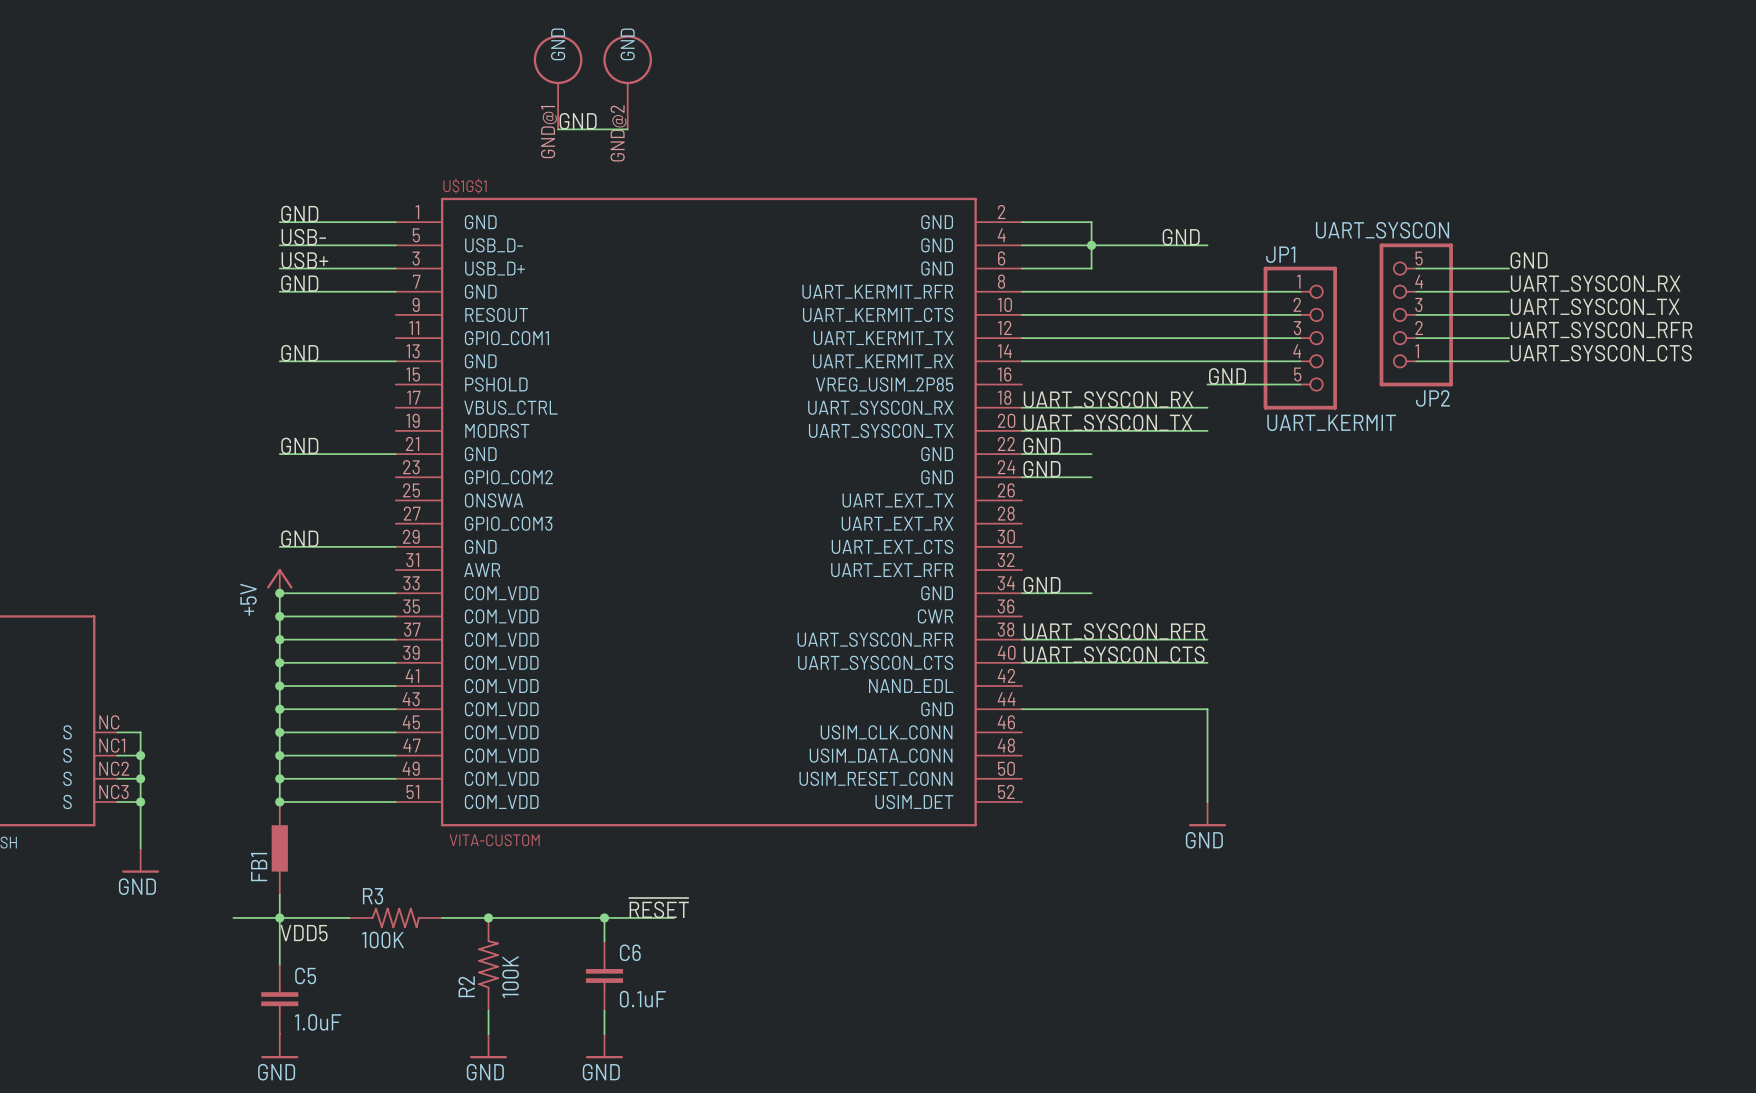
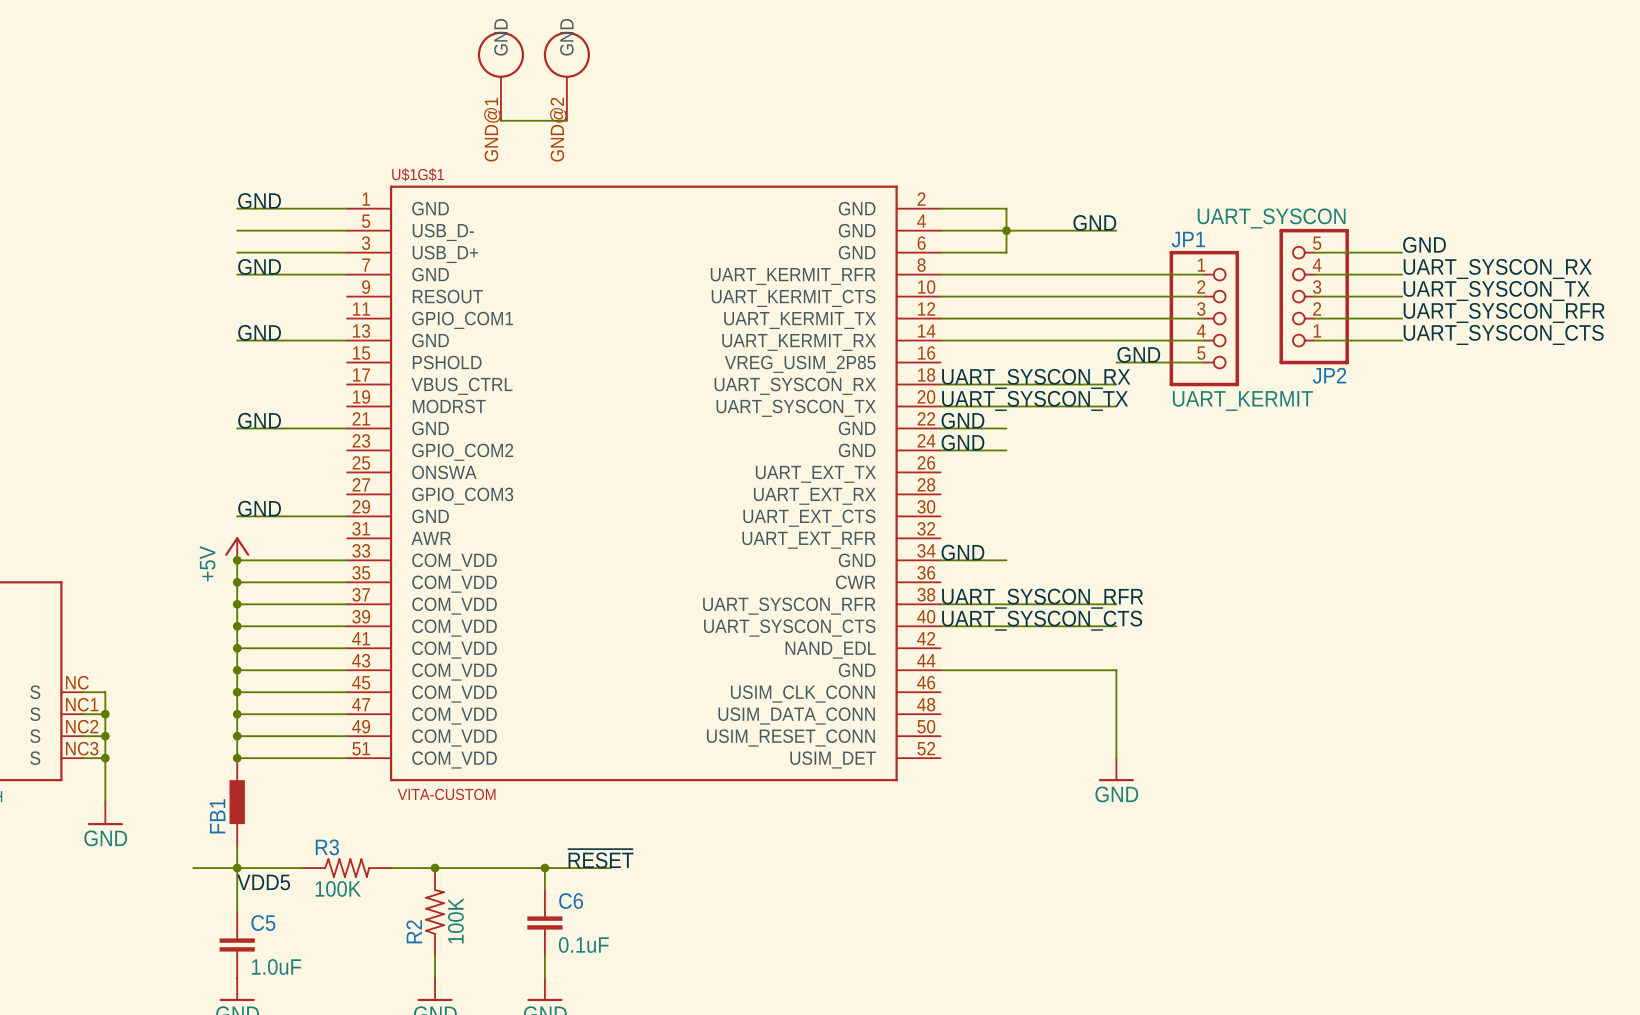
label: GND (578, 121) -> none
label: USB- (303, 237) -> none
label: USB+ (304, 260) -> none

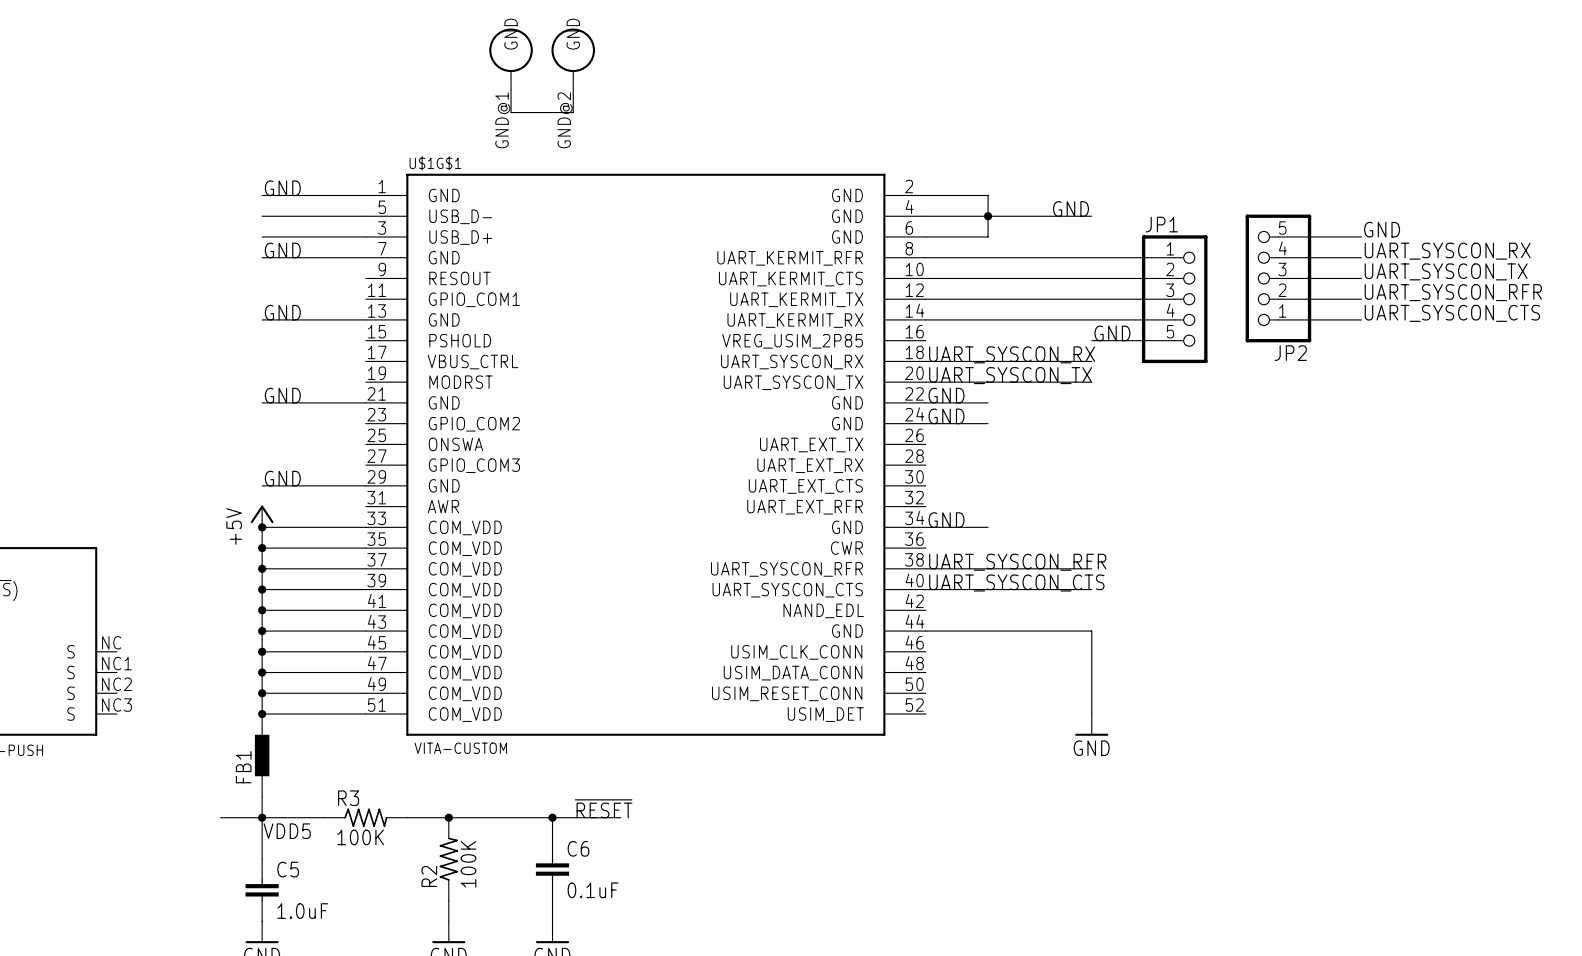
JP2 value: UART_SYSCON (1271, 218) -> none
JP1 value: UART_KERMIT (1242, 401) -> none
wire: (83, 692) (105, 692) (105, 802) -> none
wire: (83, 714) (105, 714) -> none
junction: (105, 714) -> none
wire: (83, 736) (105, 736) -> none
junction: (105, 736) -> none
wire: (83, 758) (105, 758) -> none
junction: (105, 758) -> none
power symbol: GND (105, 813) -> none

